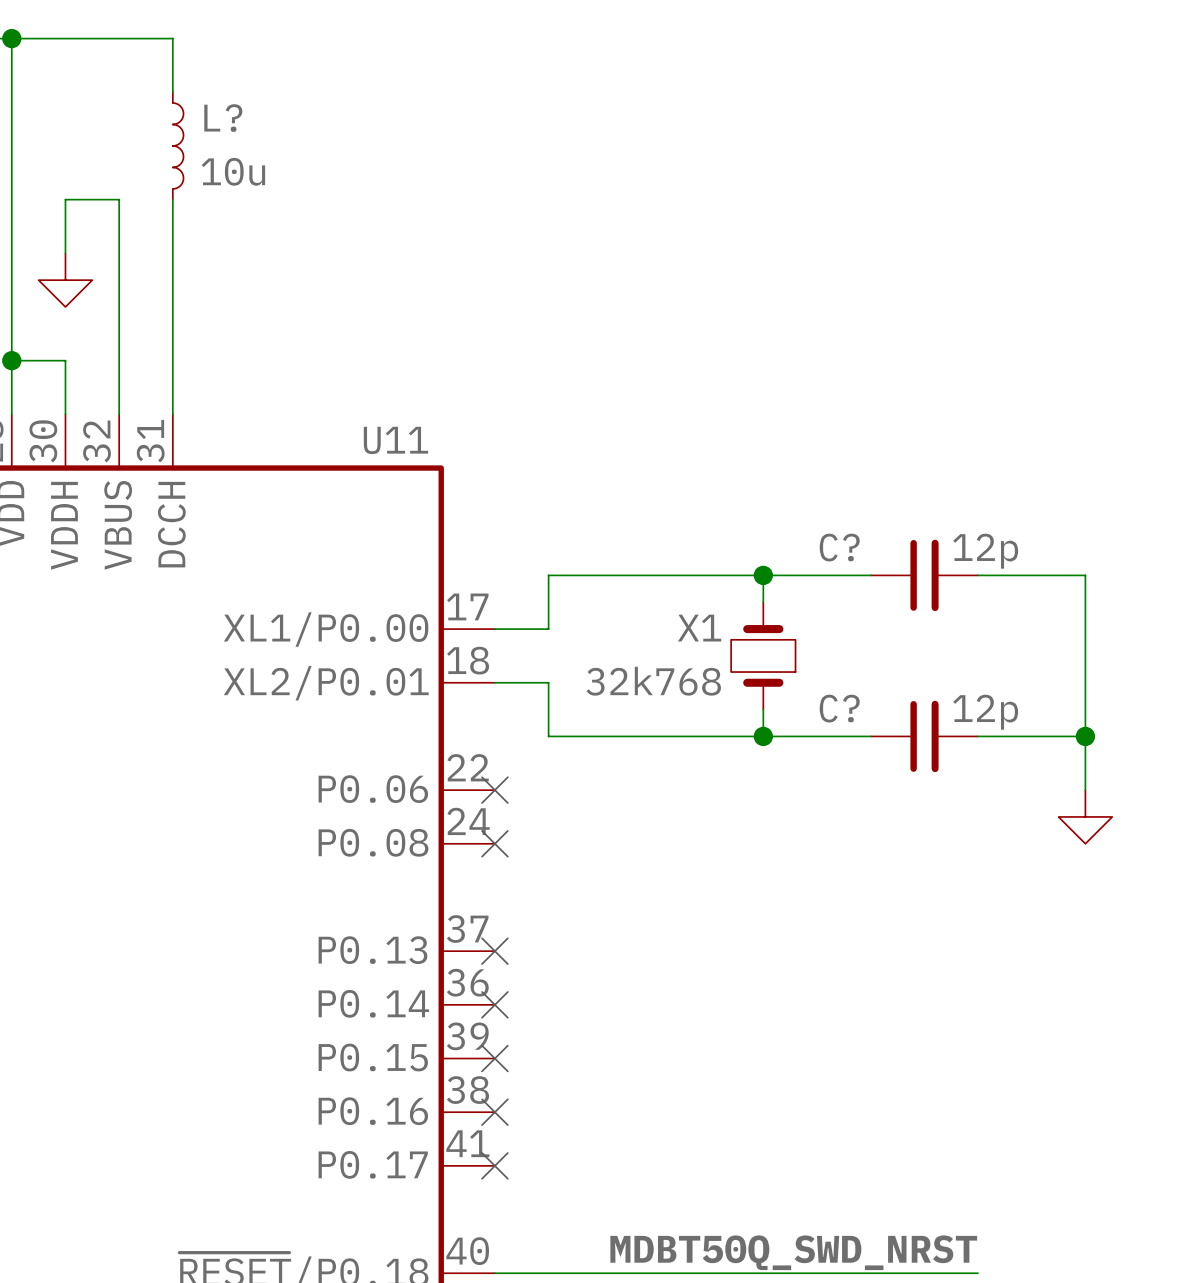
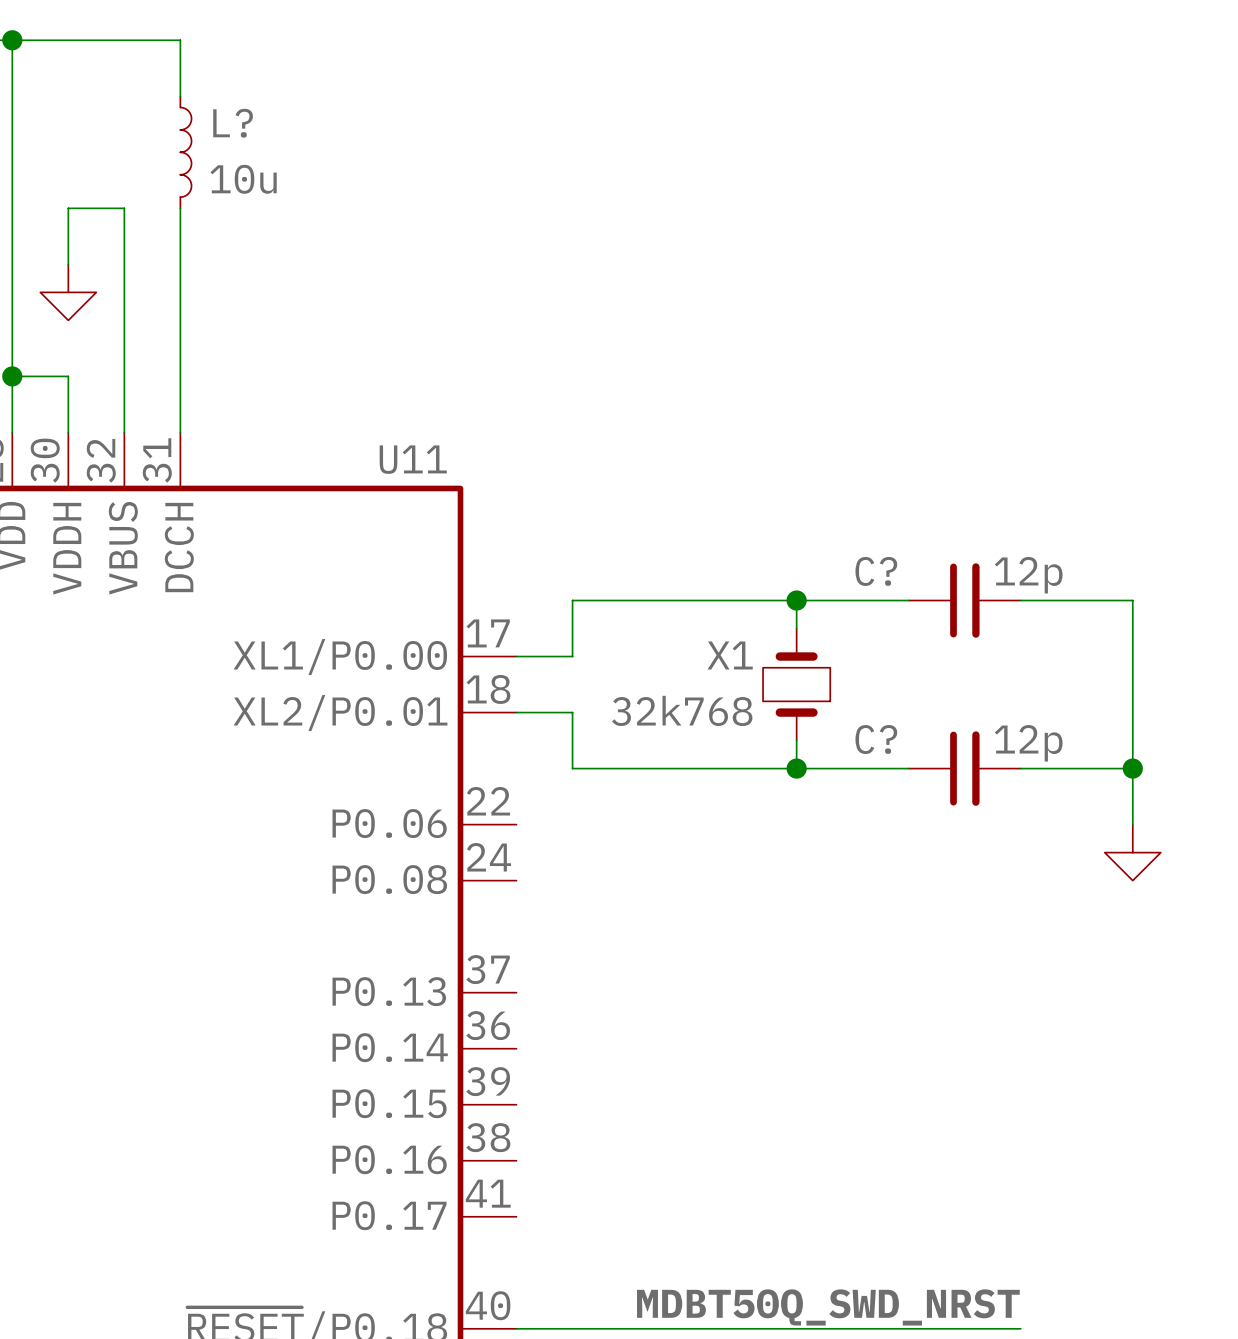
no-connect mark: (494, 790) -> none
no-connect mark: (494, 843) -> none
no-connect mark: (494, 951) -> none
no-connect mark: (494, 1004) -> none
no-connect mark: (494, 1058) -> none
no-connect mark: (494, 1112) -> none
no-connect mark: (494, 1165) -> none

